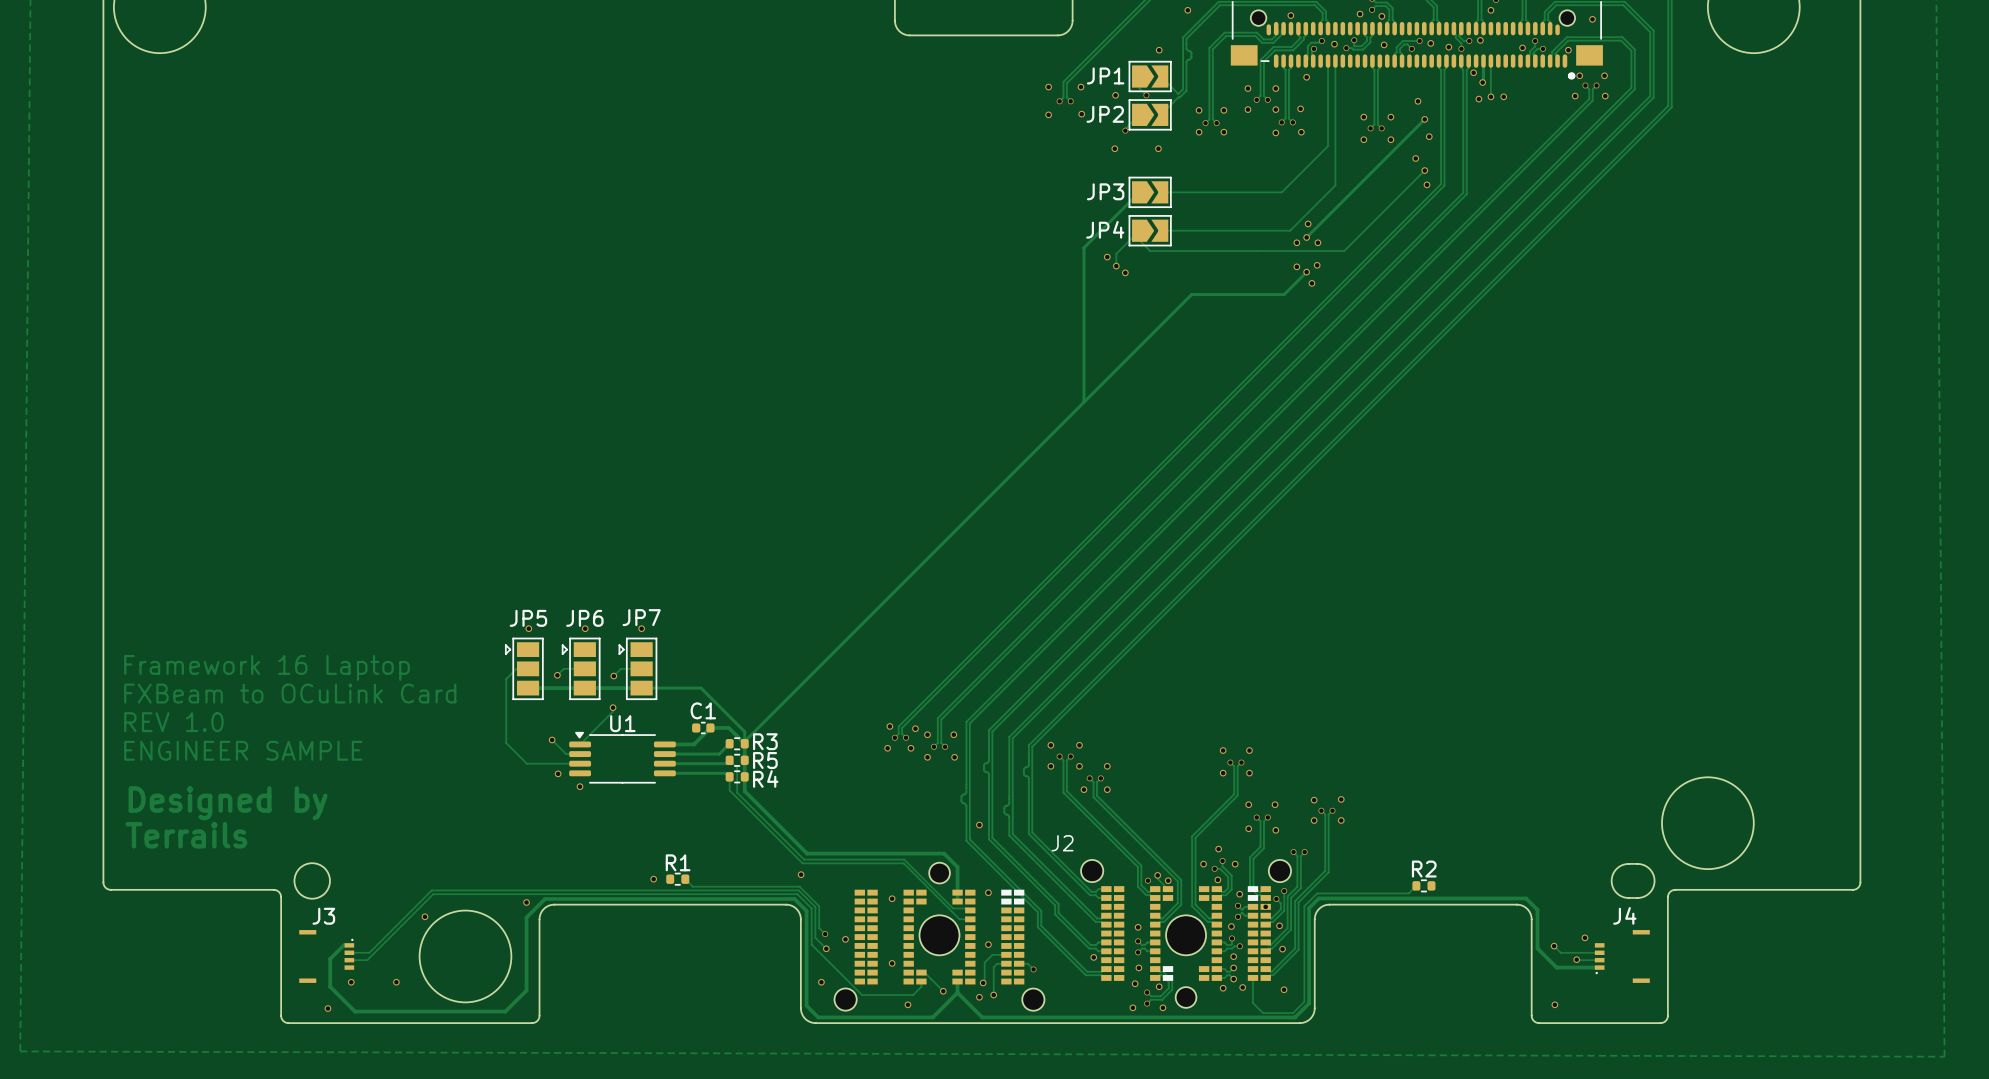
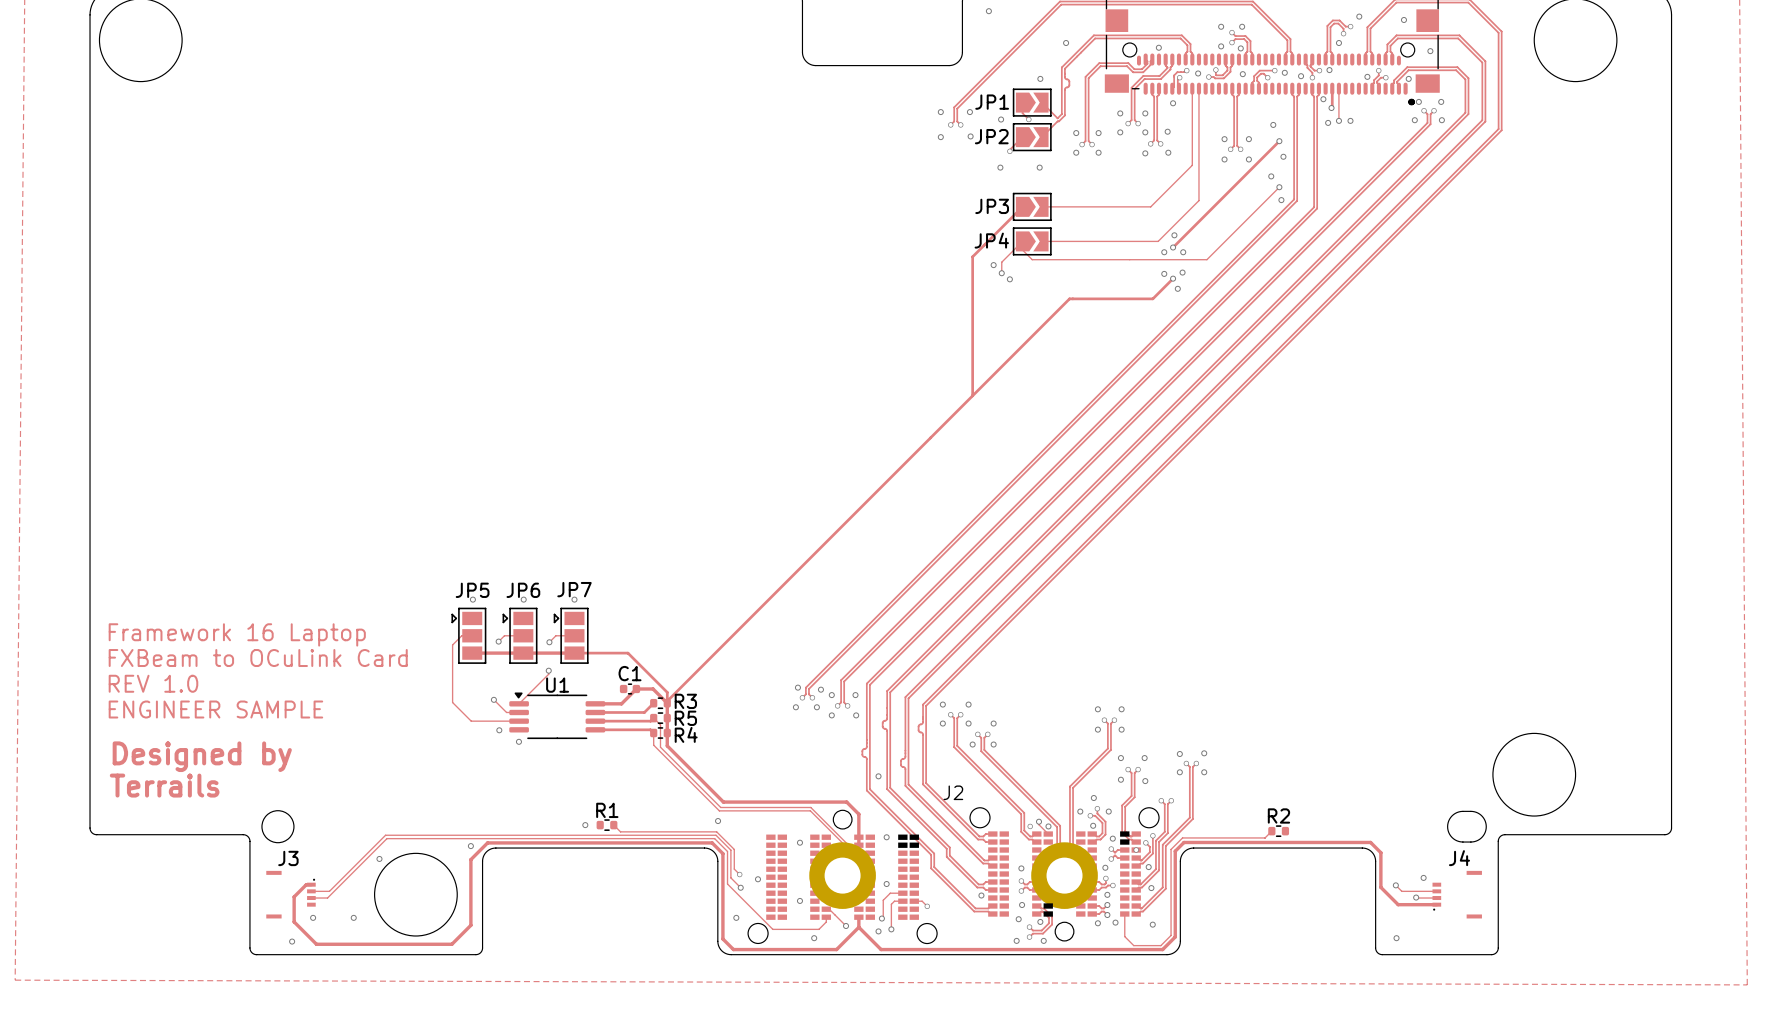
J2 footprint: [834, 859, 1292, 1011] -> [748, 807, 1160, 944]

